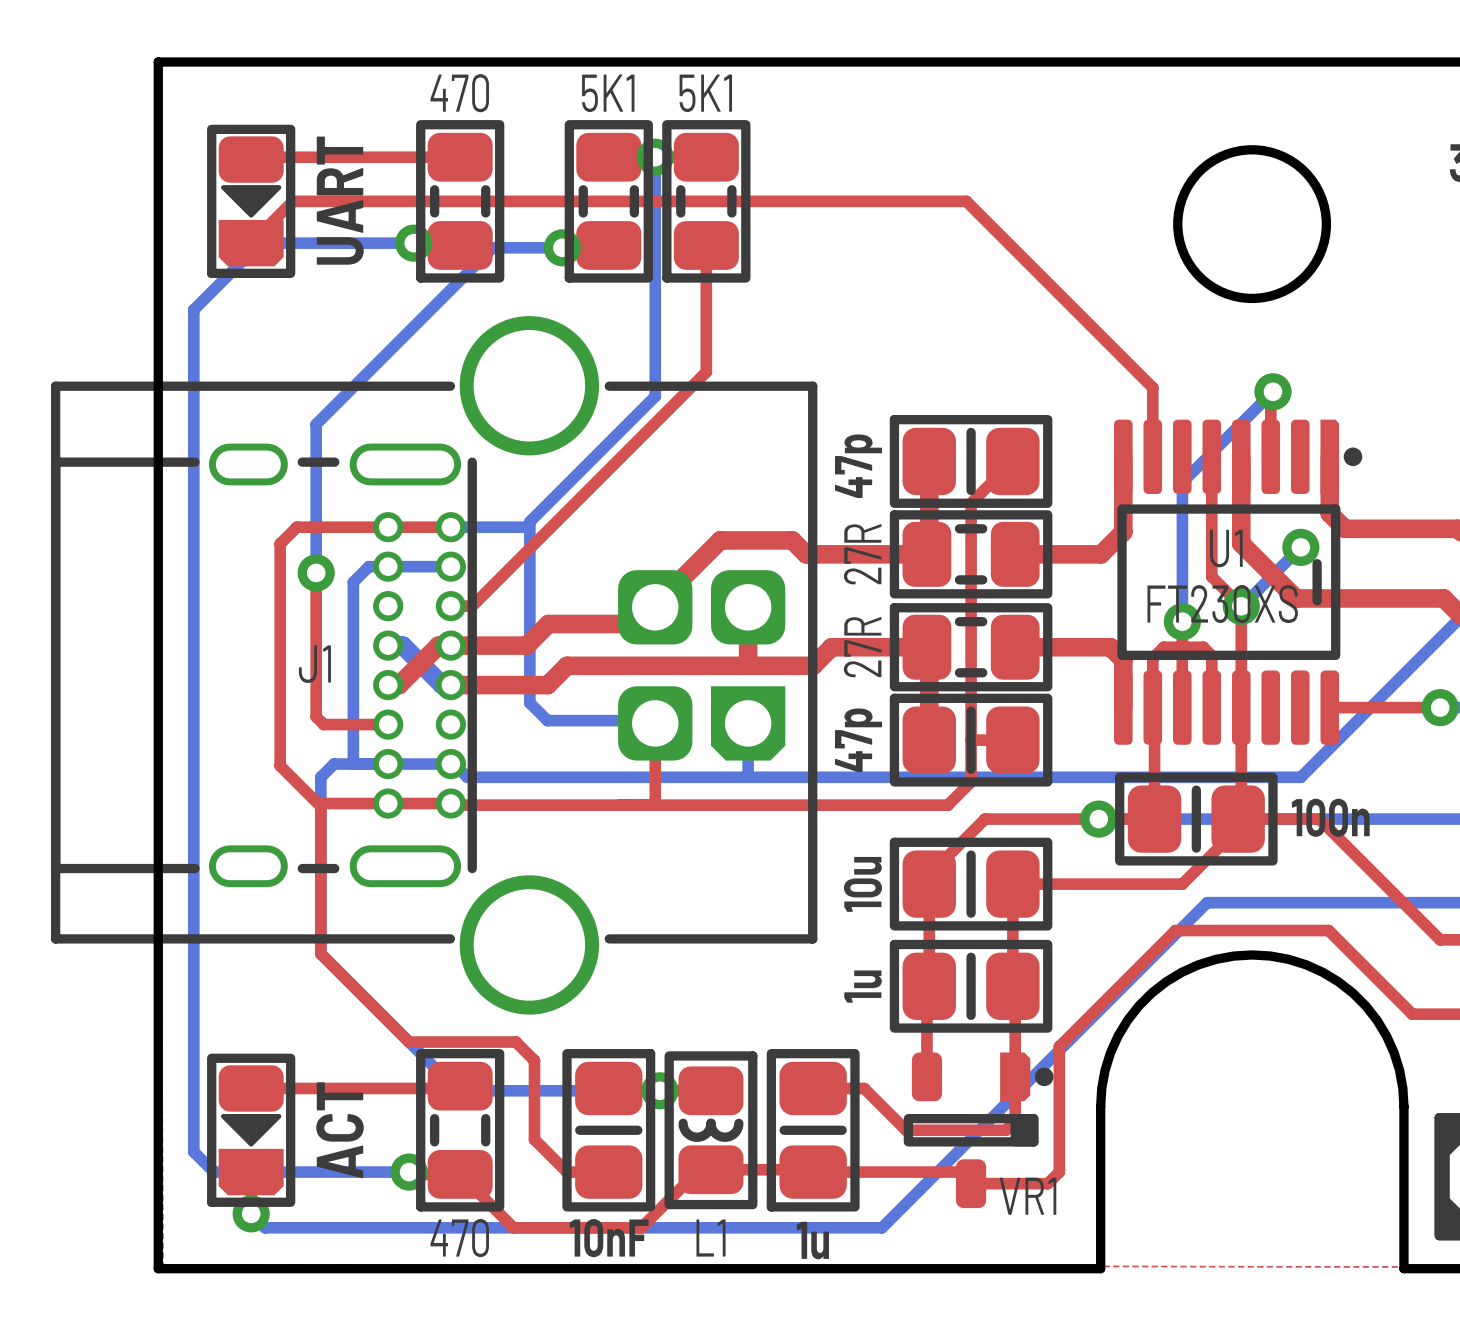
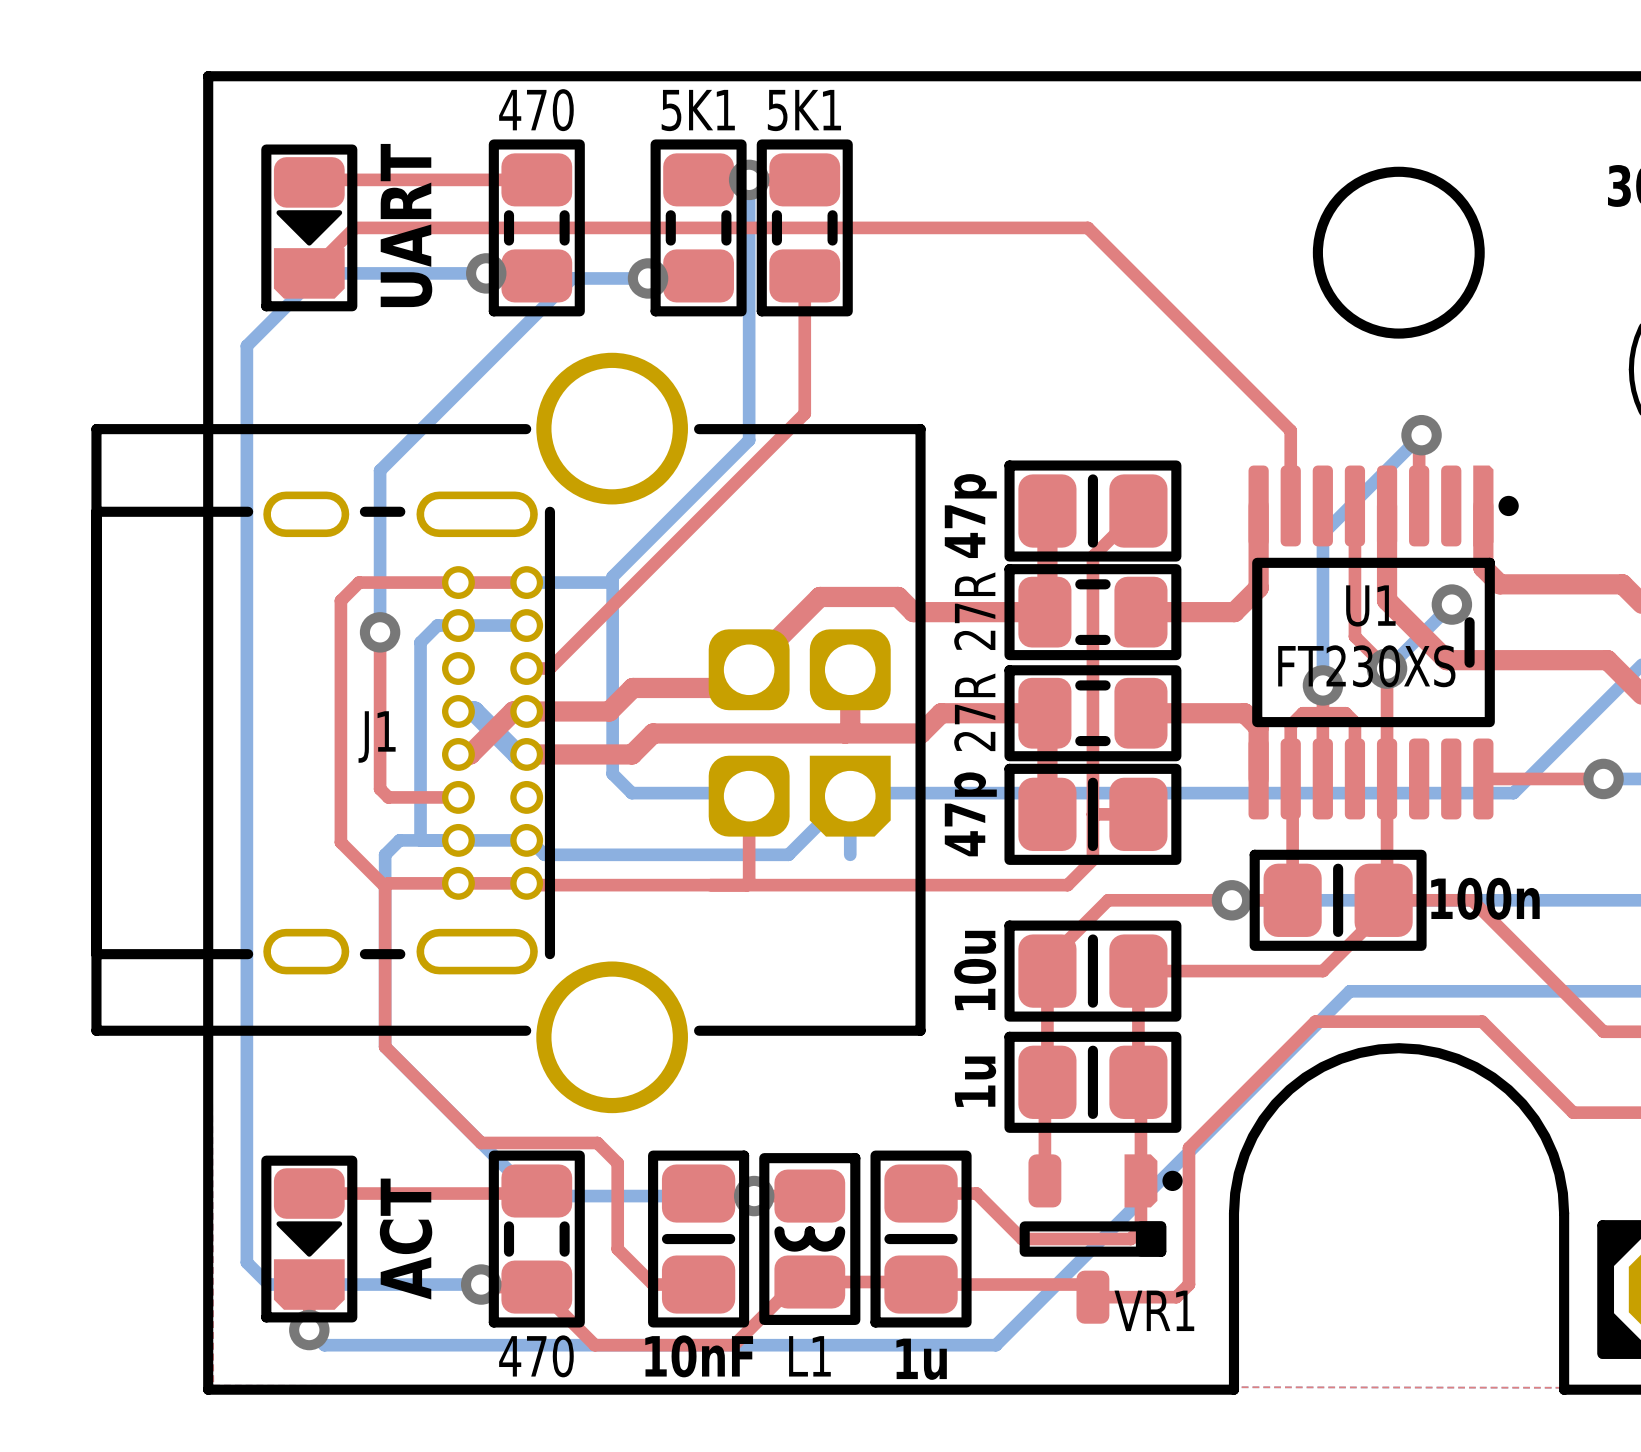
bottom track: (1357, 720) (1300, 777) (691, 777) -> (1513, 793) (850, 793) (788, 854)

